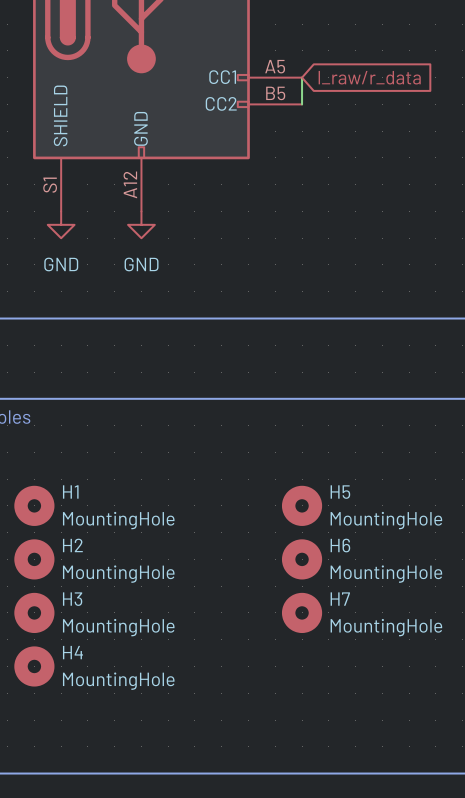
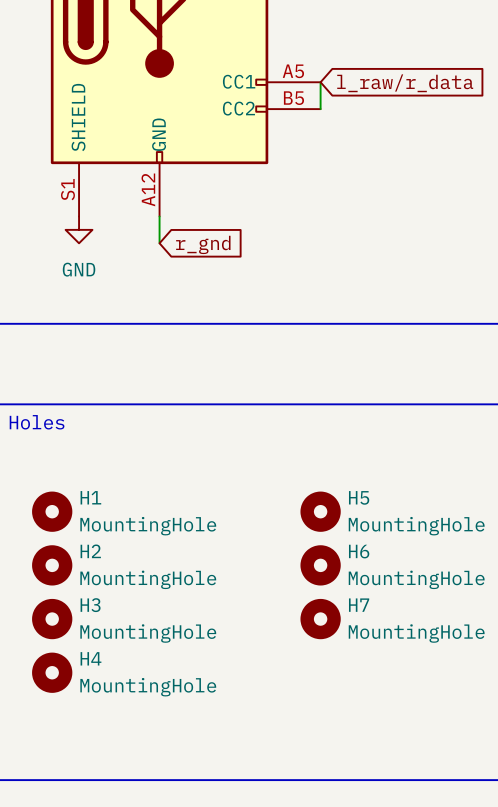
power symbol: GND (141, 224) -> none
global label: none -> r_gnd (203, 244)

